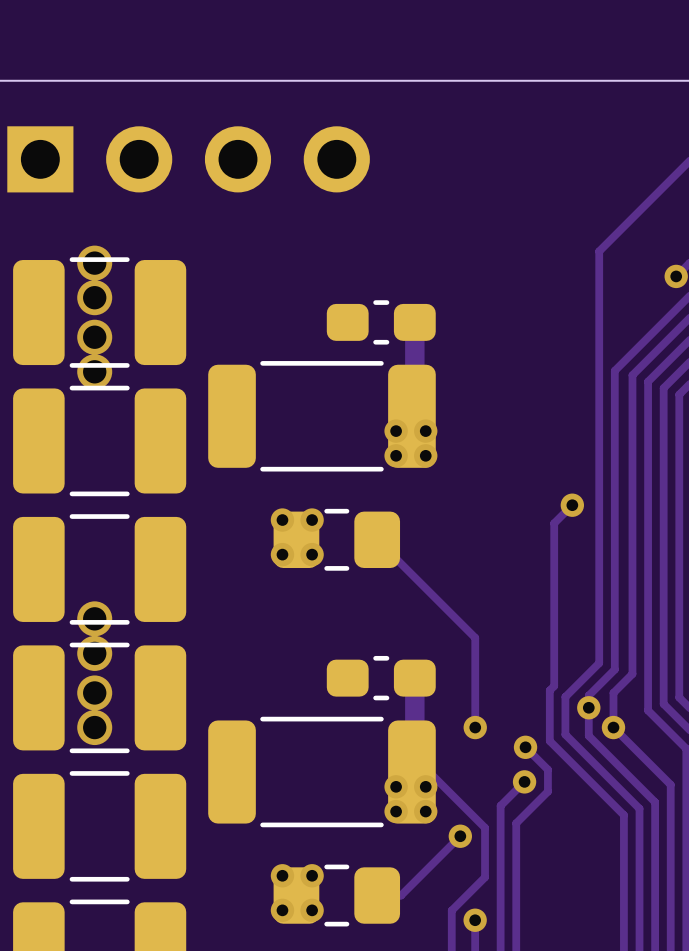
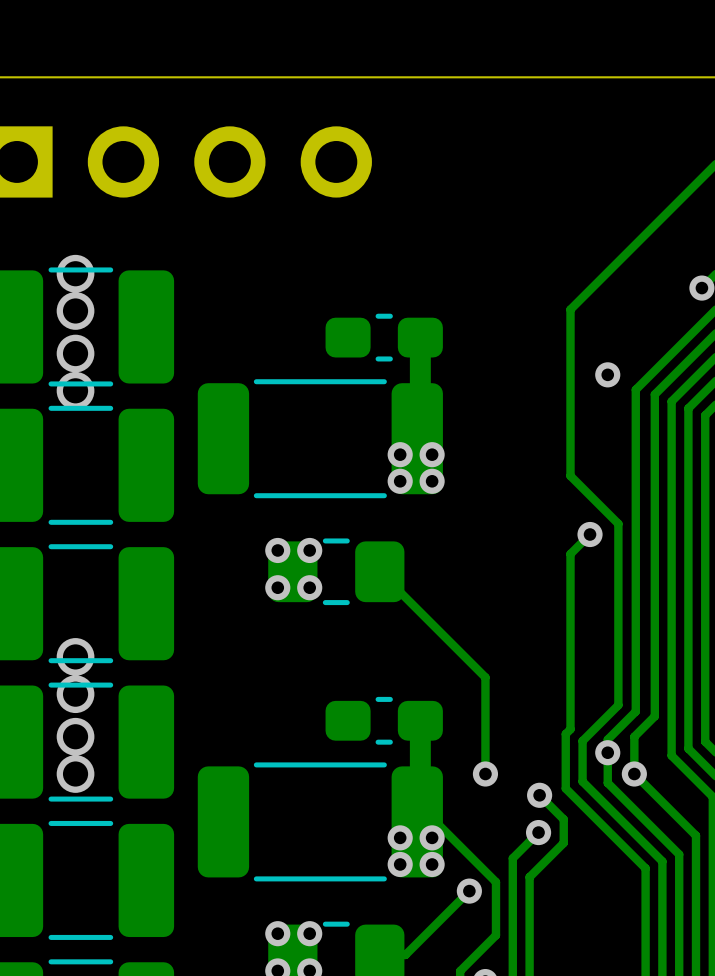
track: (599, 251) (599, 663) -> (618, 261) (570, 309) (570, 475) (618, 523) (618, 705)
via: none -> (607, 374)

